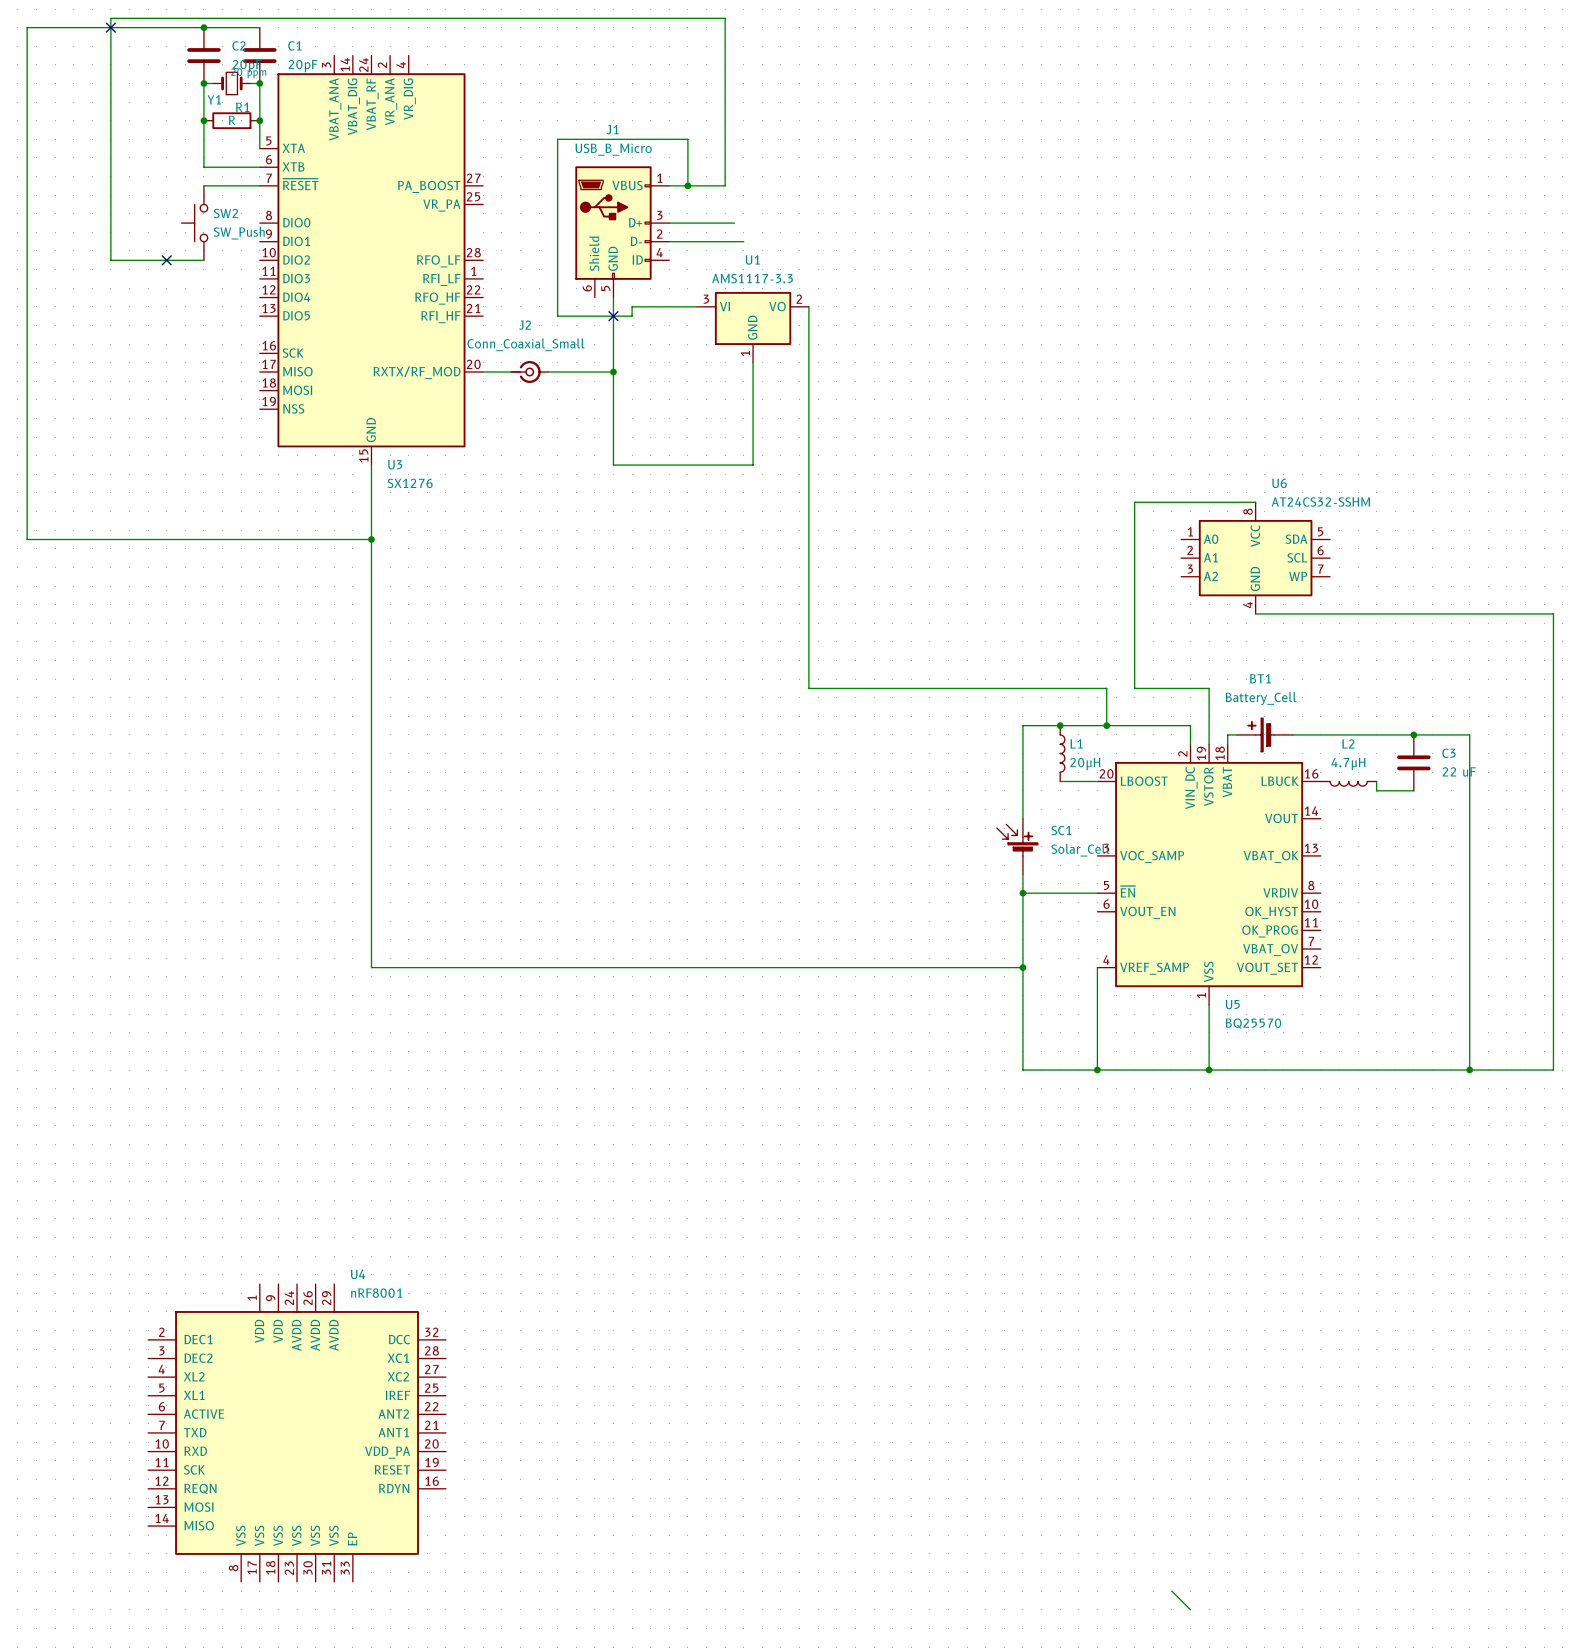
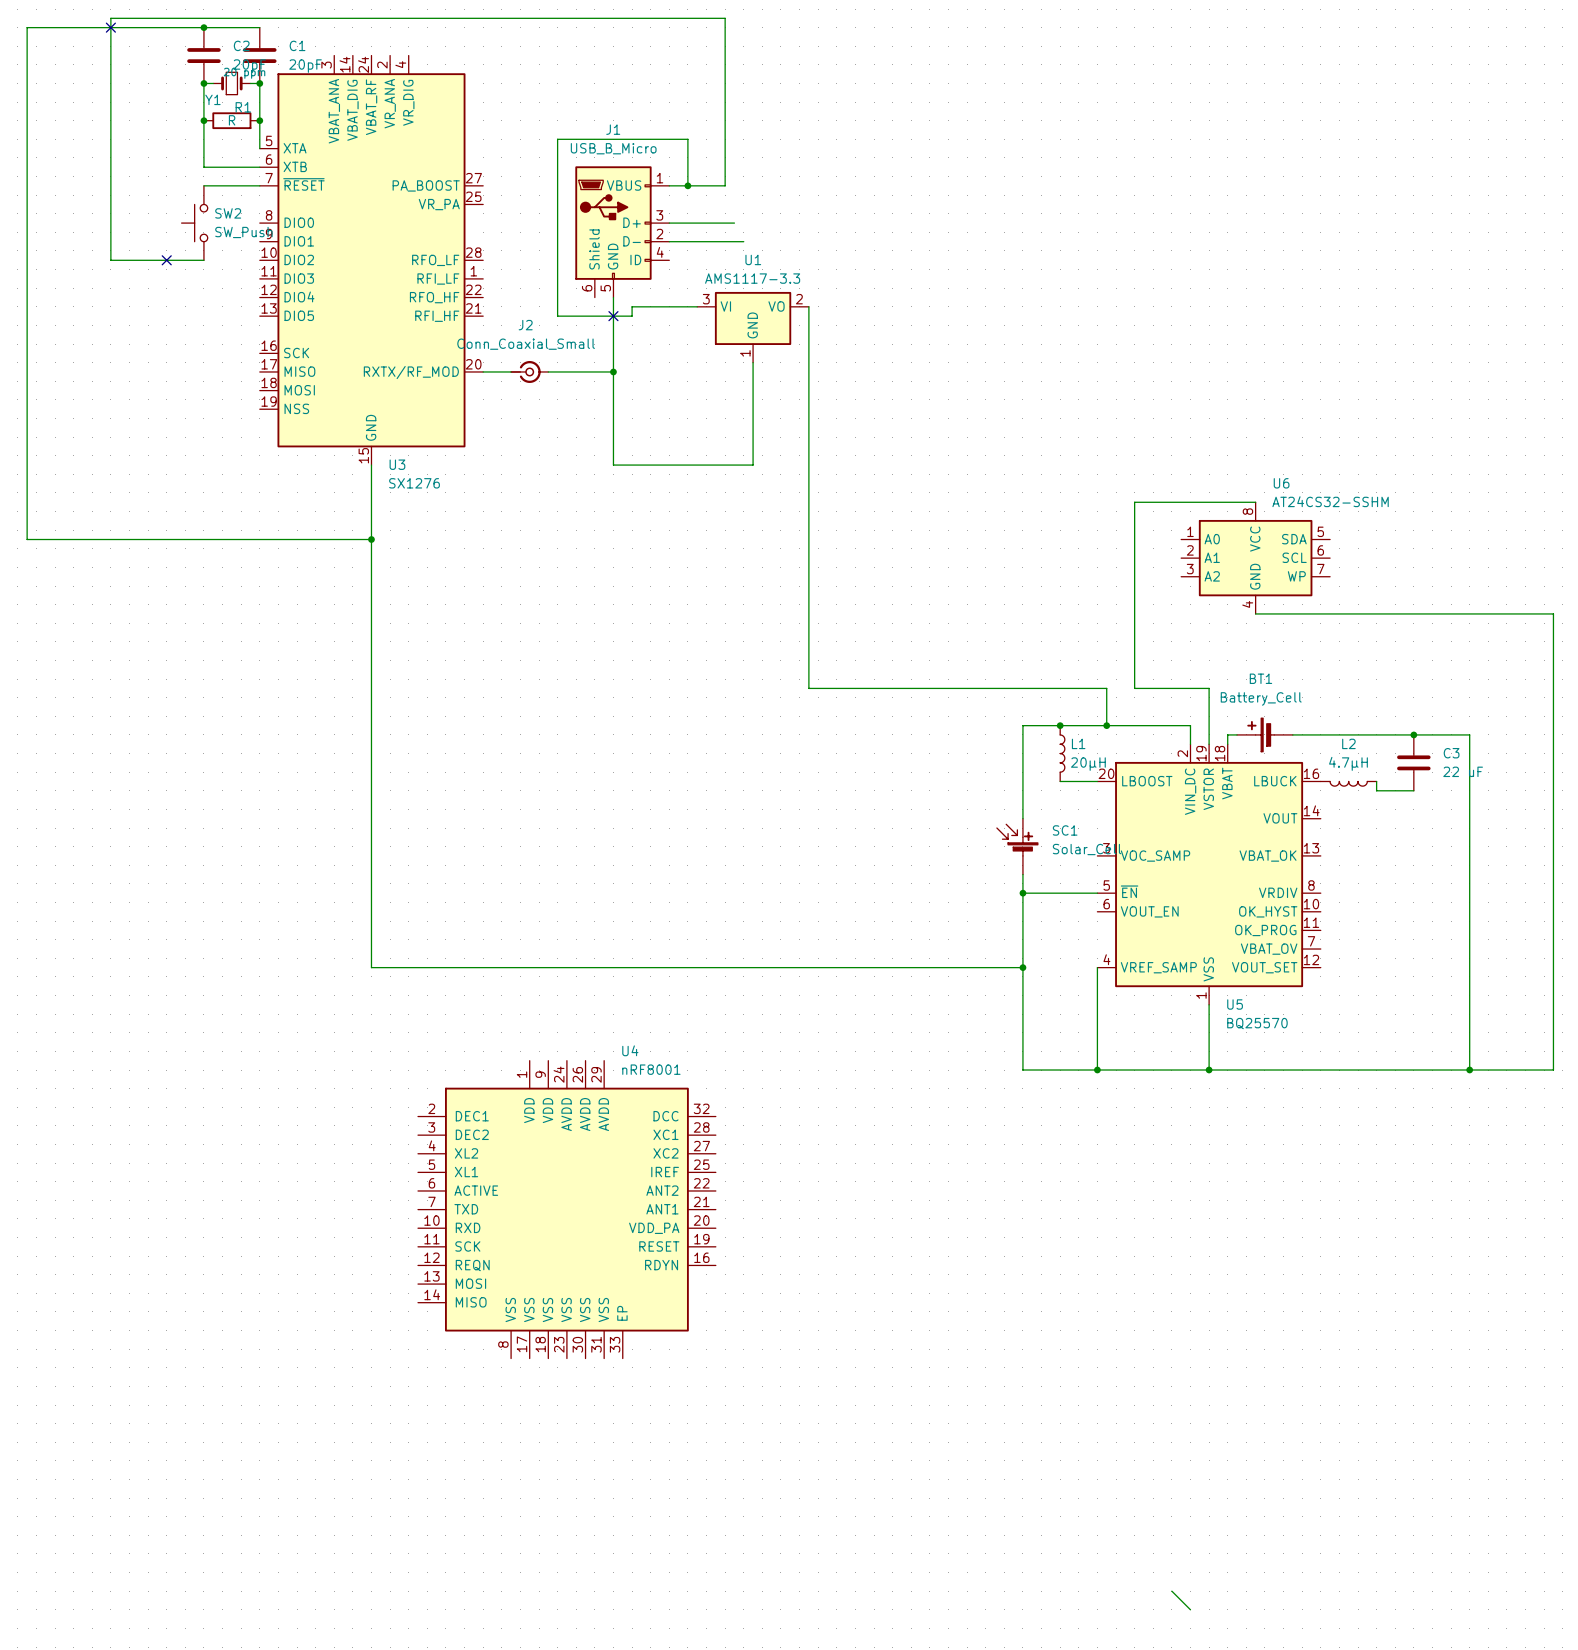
U4 position: (297, 1432) -> (566, 1209)

